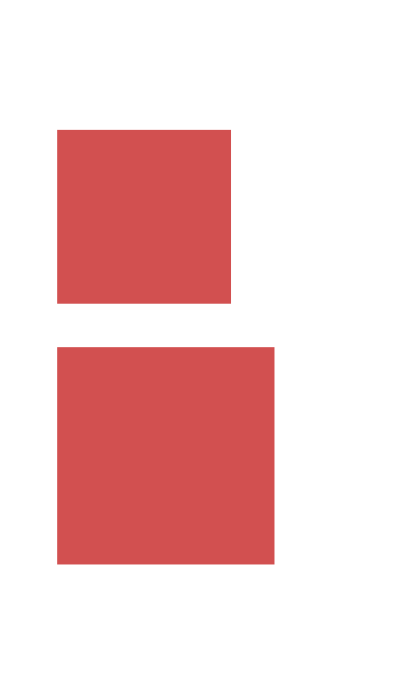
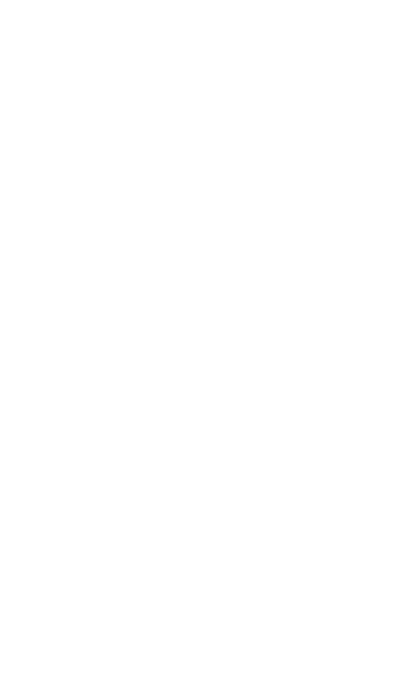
drawing: [57, 129, 275, 565] -> none

